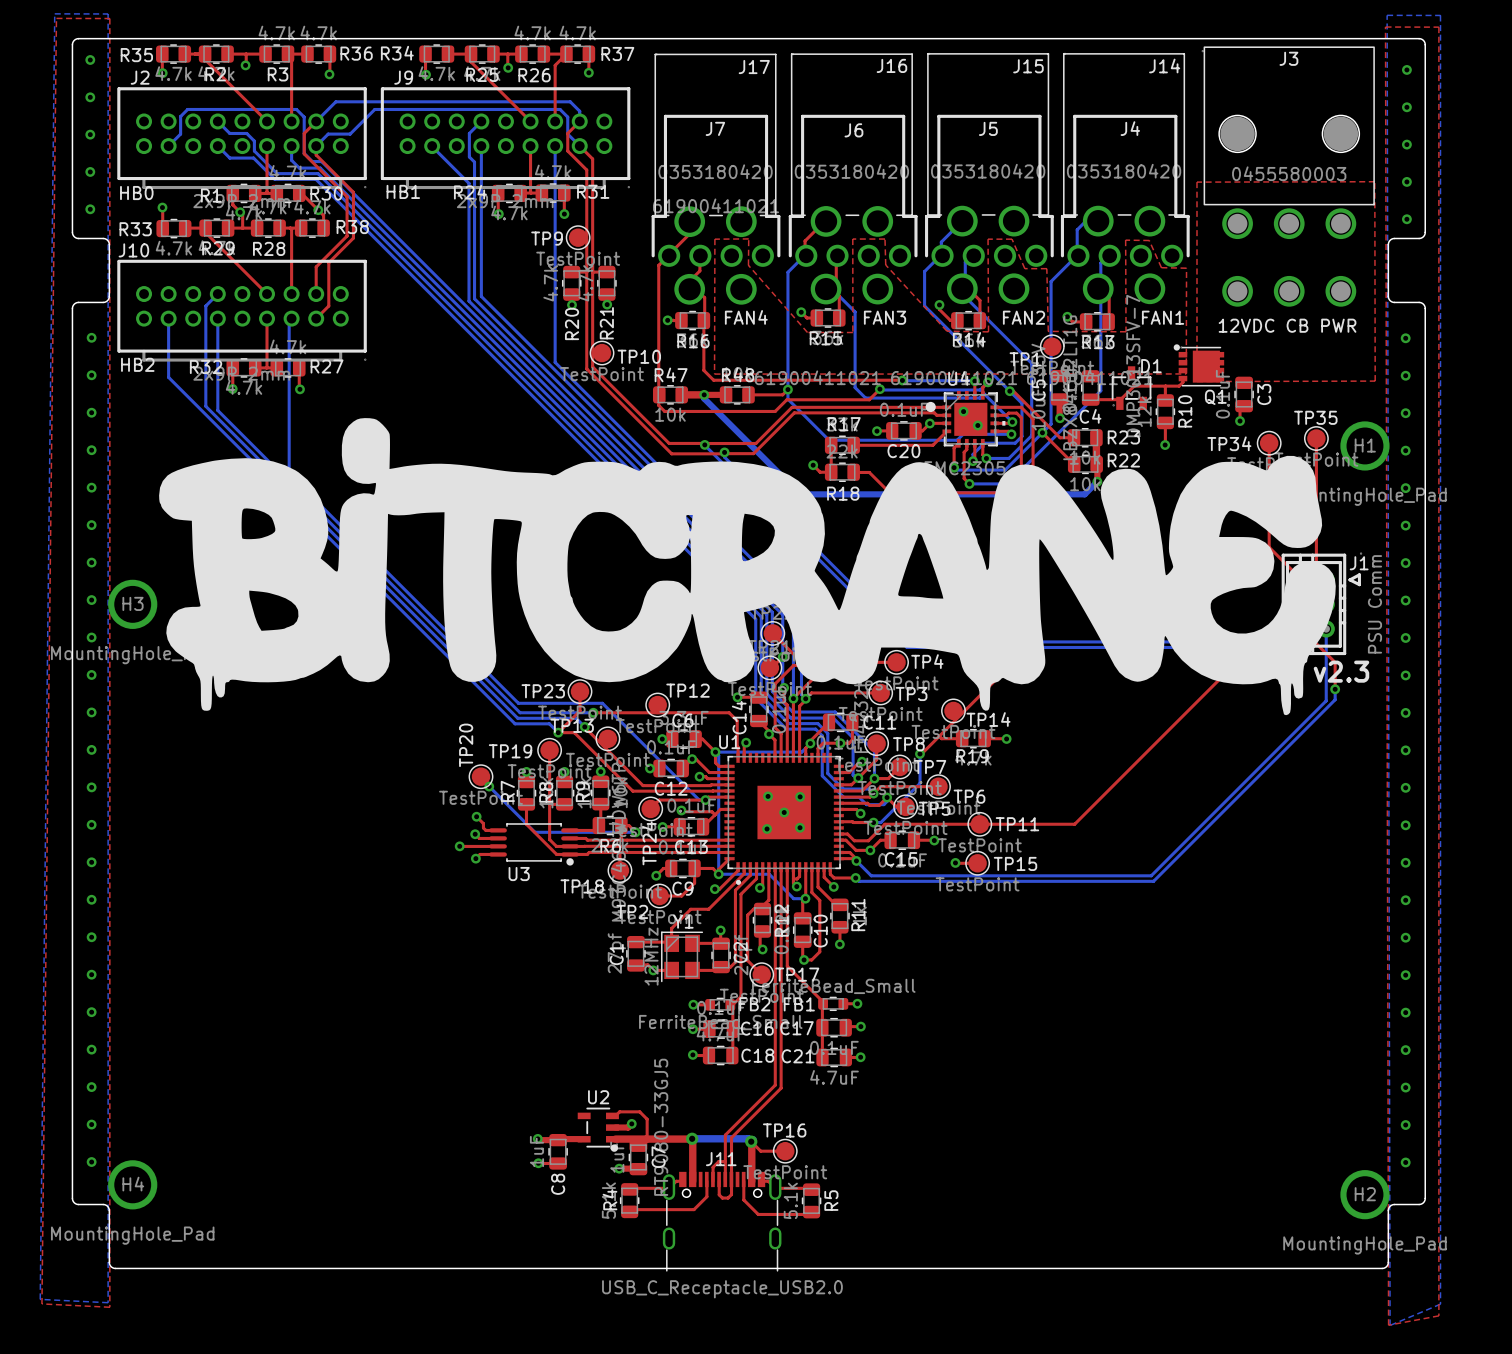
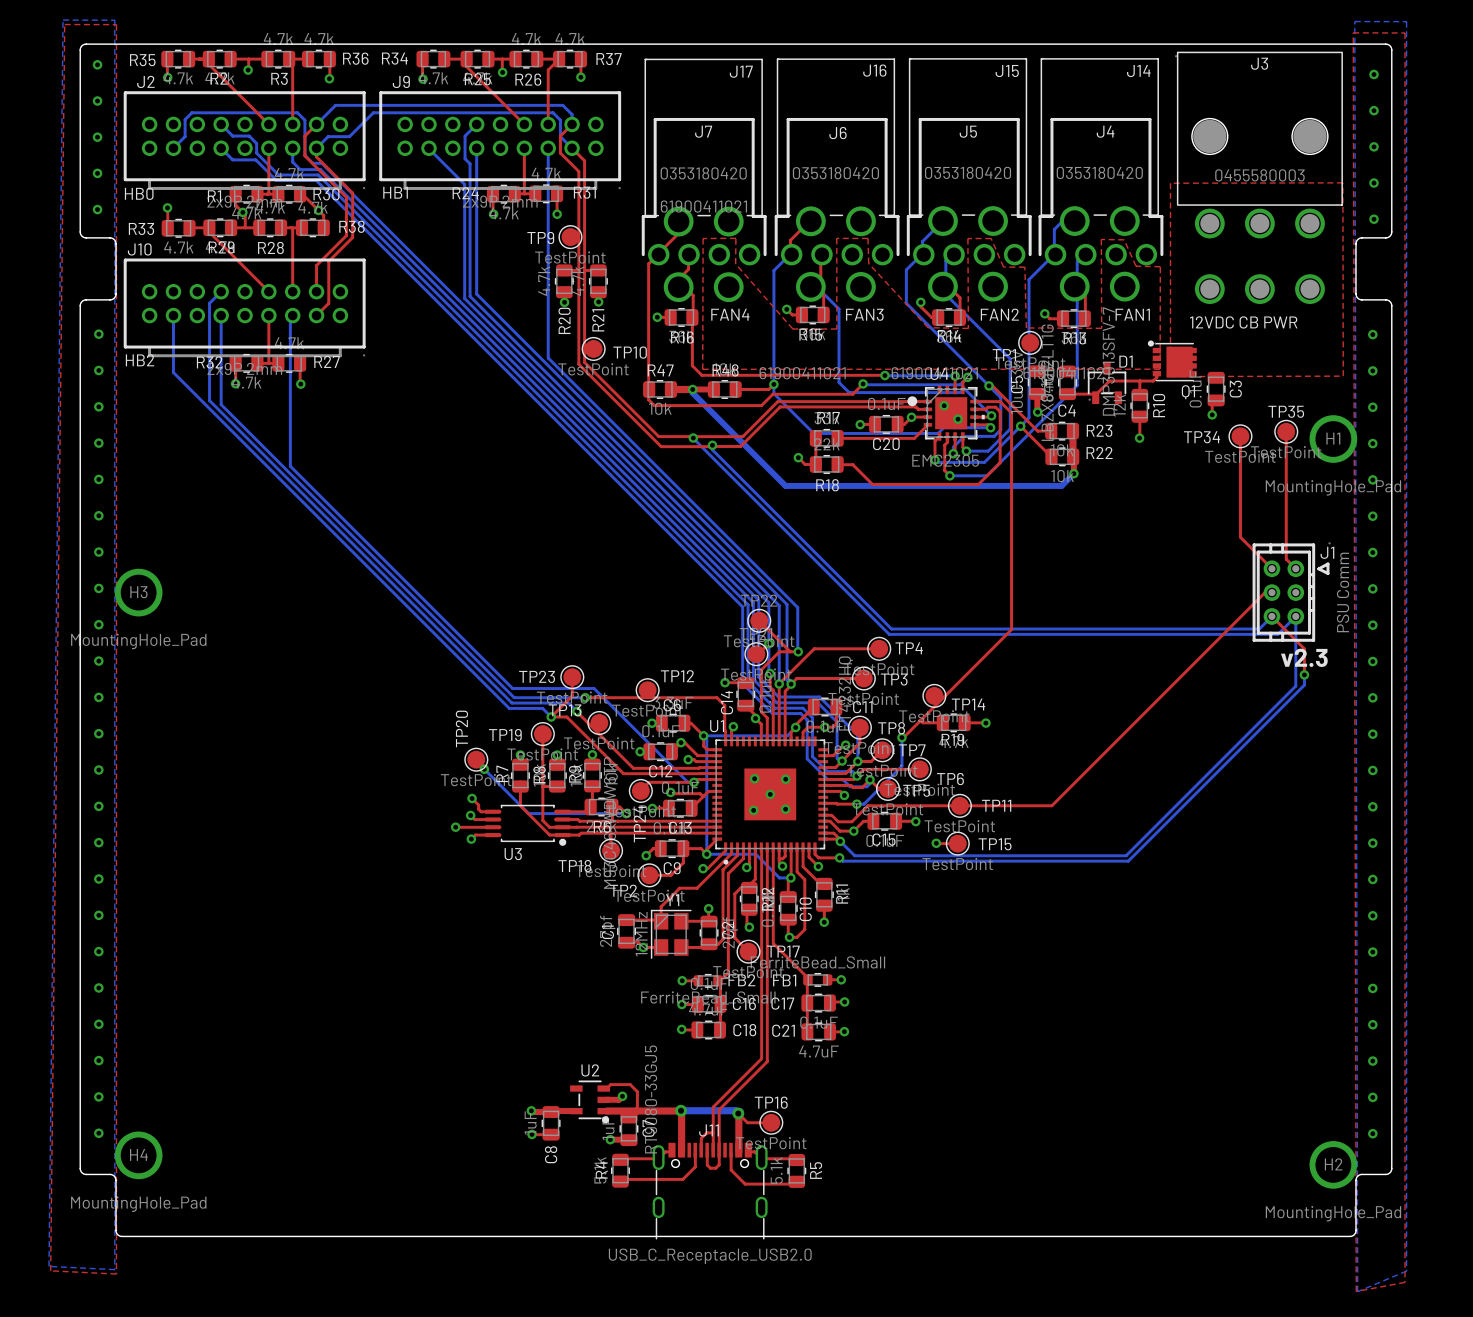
drawing: [159, 418, 1336, 716] -> none

